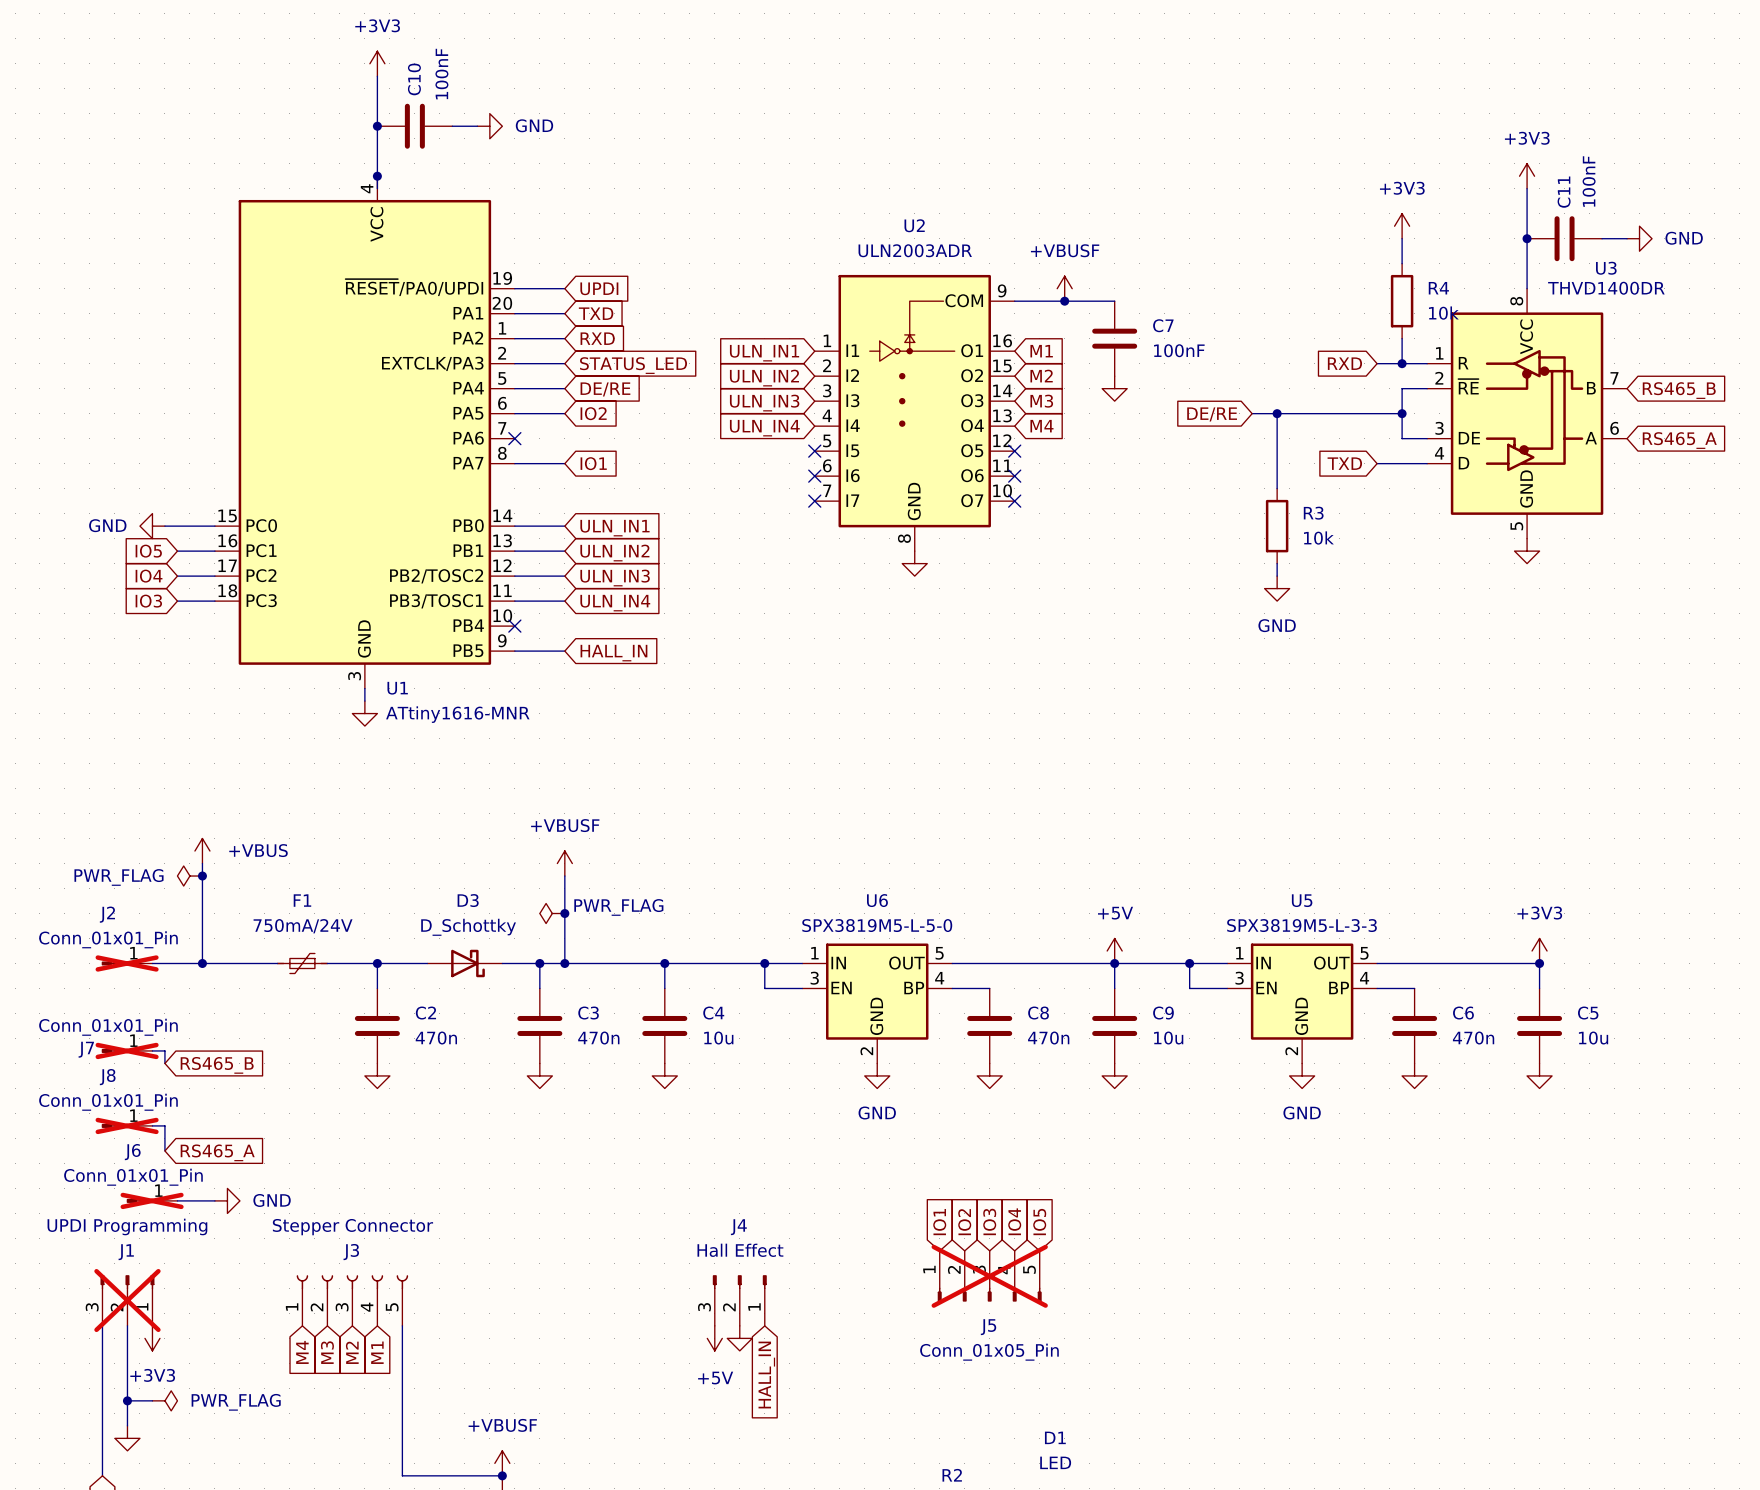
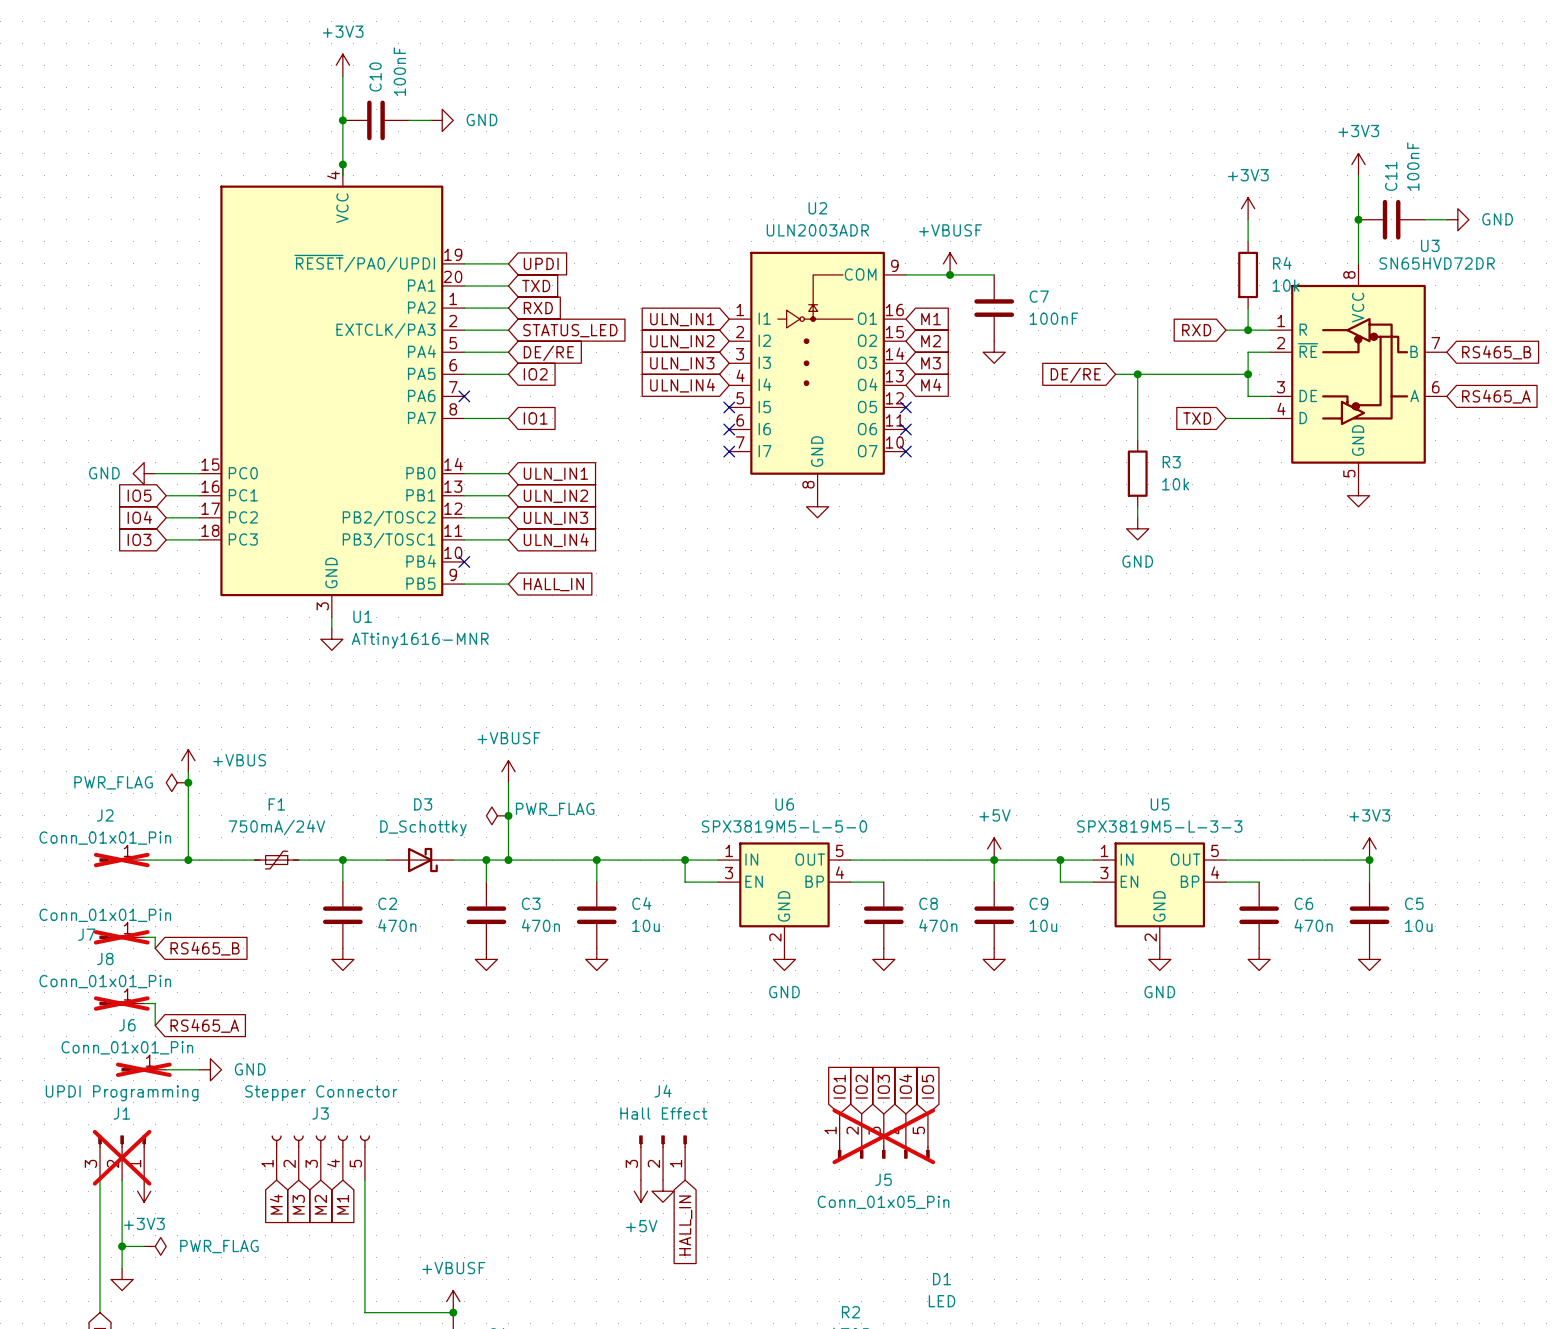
U3 value: THVD1400DR (1606, 288) -> SN65HVD72DR (1437, 263)

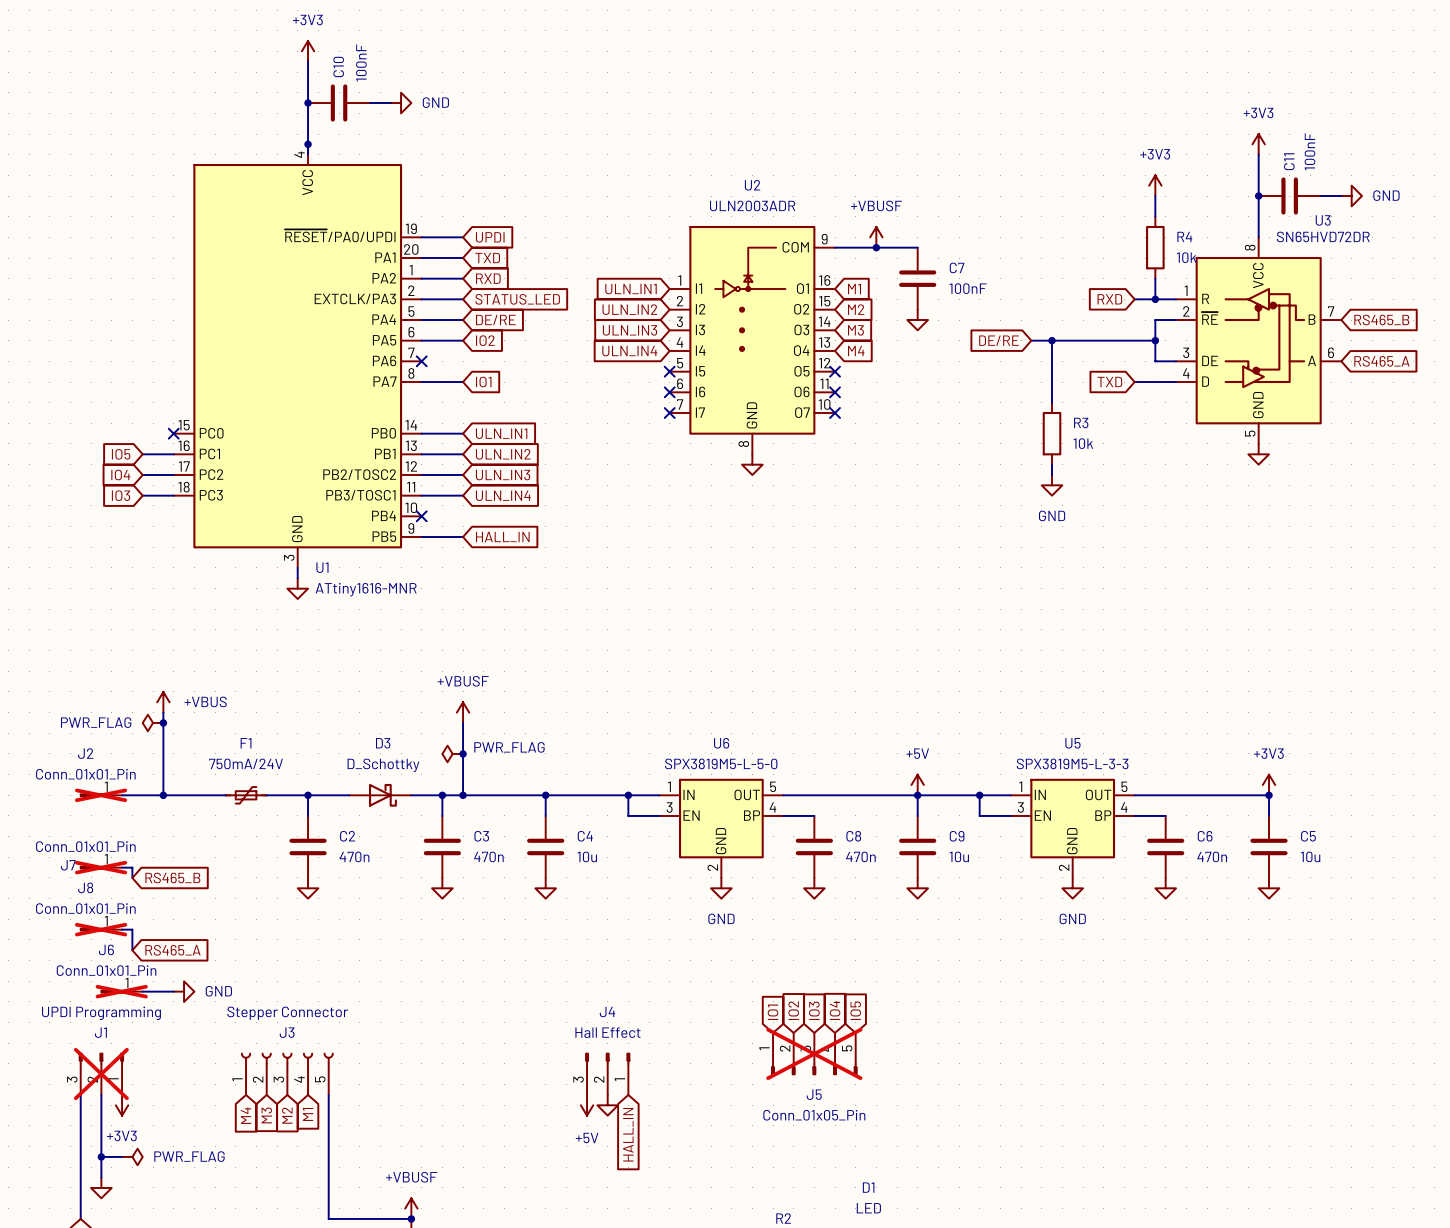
power symbol: GND (144, 473) -> none
wire: (155, 473) (199, 473) -> none
no-connect mark: none -> (173, 433)

